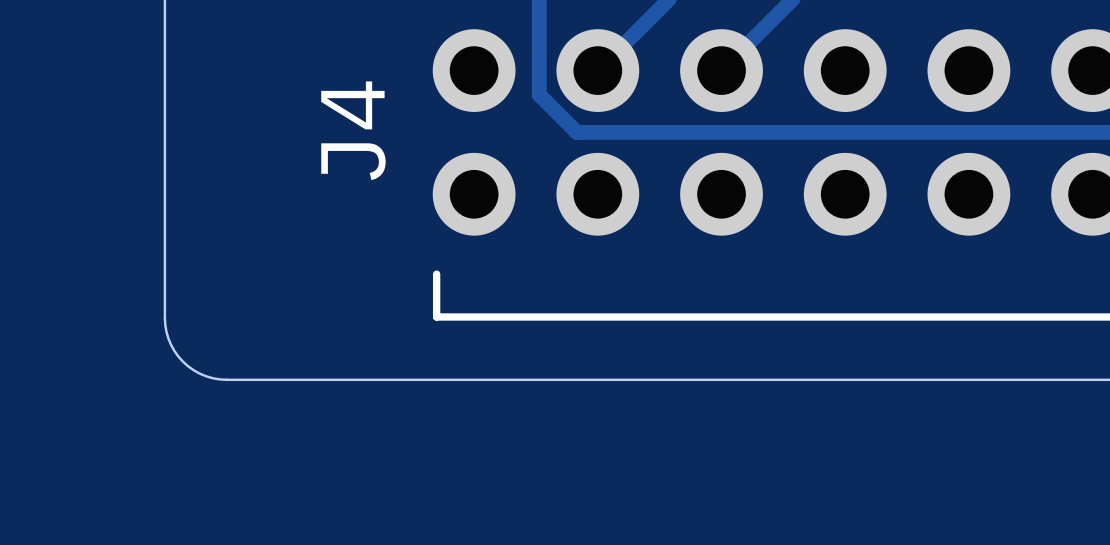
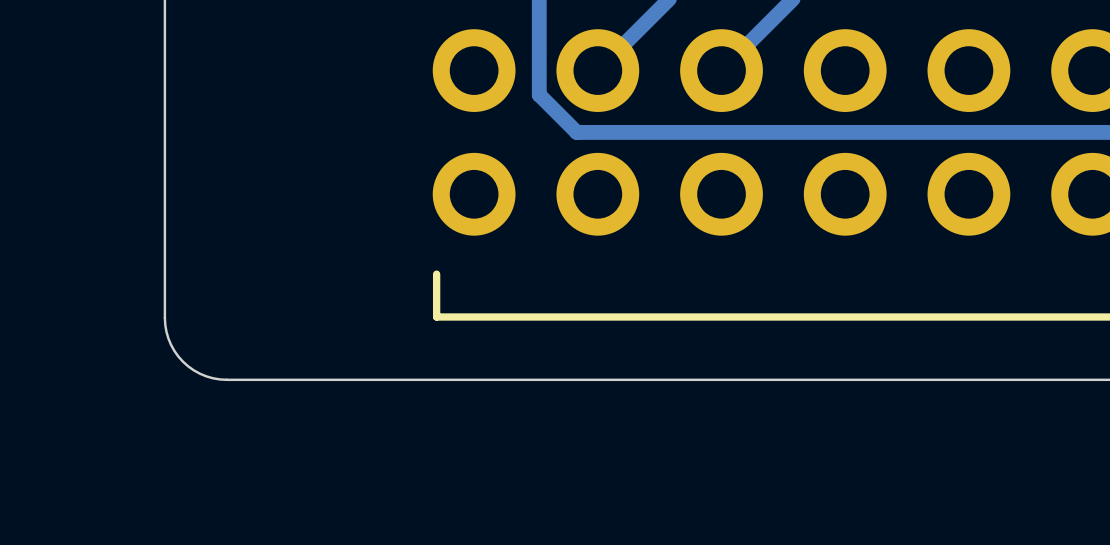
text: J4 (353, 130) -> none

